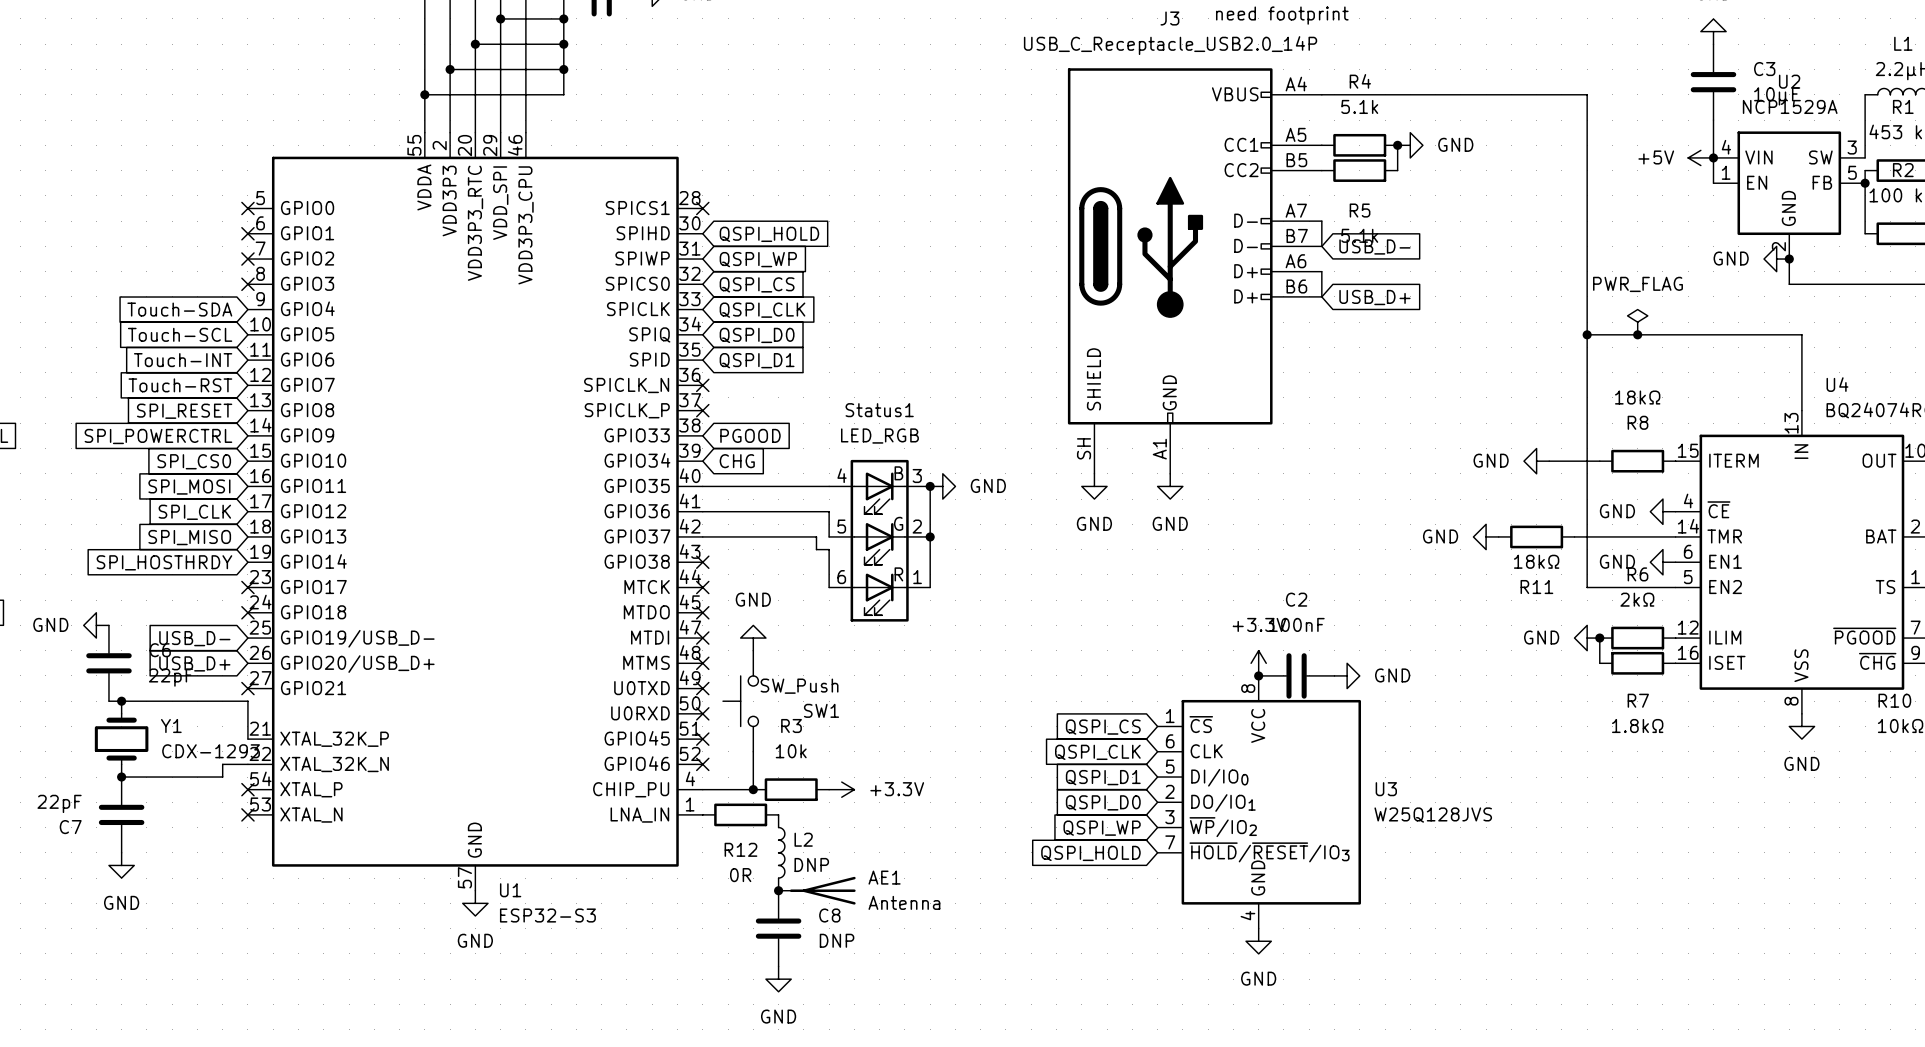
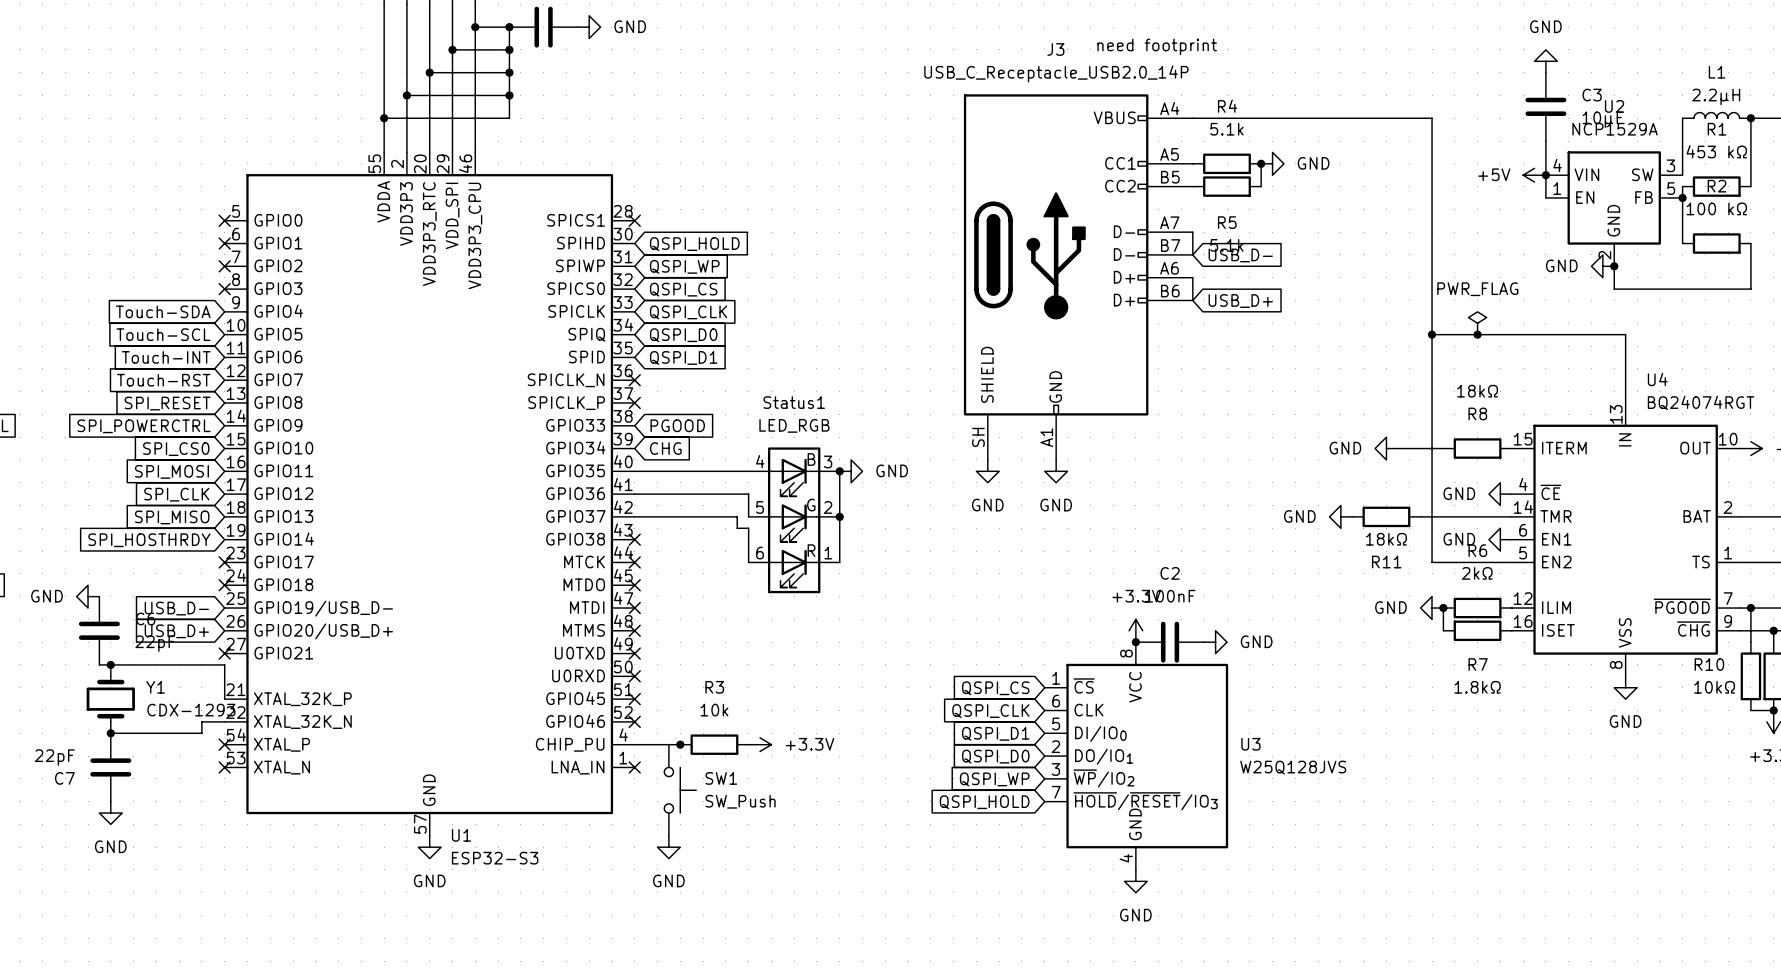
power symbol: GND (753, 638) -> none
SW1 value position: SW_Push (799, 686) -> SW_Push (740, 801)
SW1 rotation: 0° (740, 701) -> 180° (680, 790)
SW1 position: (740, 701) -> (680, 790)
SW1 name position: SW1 (821, 710) -> SW1 (721, 778)
wire: (753, 751) (753, 789) -> none
no-connect mark: none -> (634, 767)
R12: 0R (740, 814) -> none
L2: DNP (781, 852) -> none
junction: (778, 890) -> none
AE1: Antenna (817, 890) -> none
C8: DNP (778, 928) -> none
power symbol position: GND (778, 979) -> GND (668, 847)

